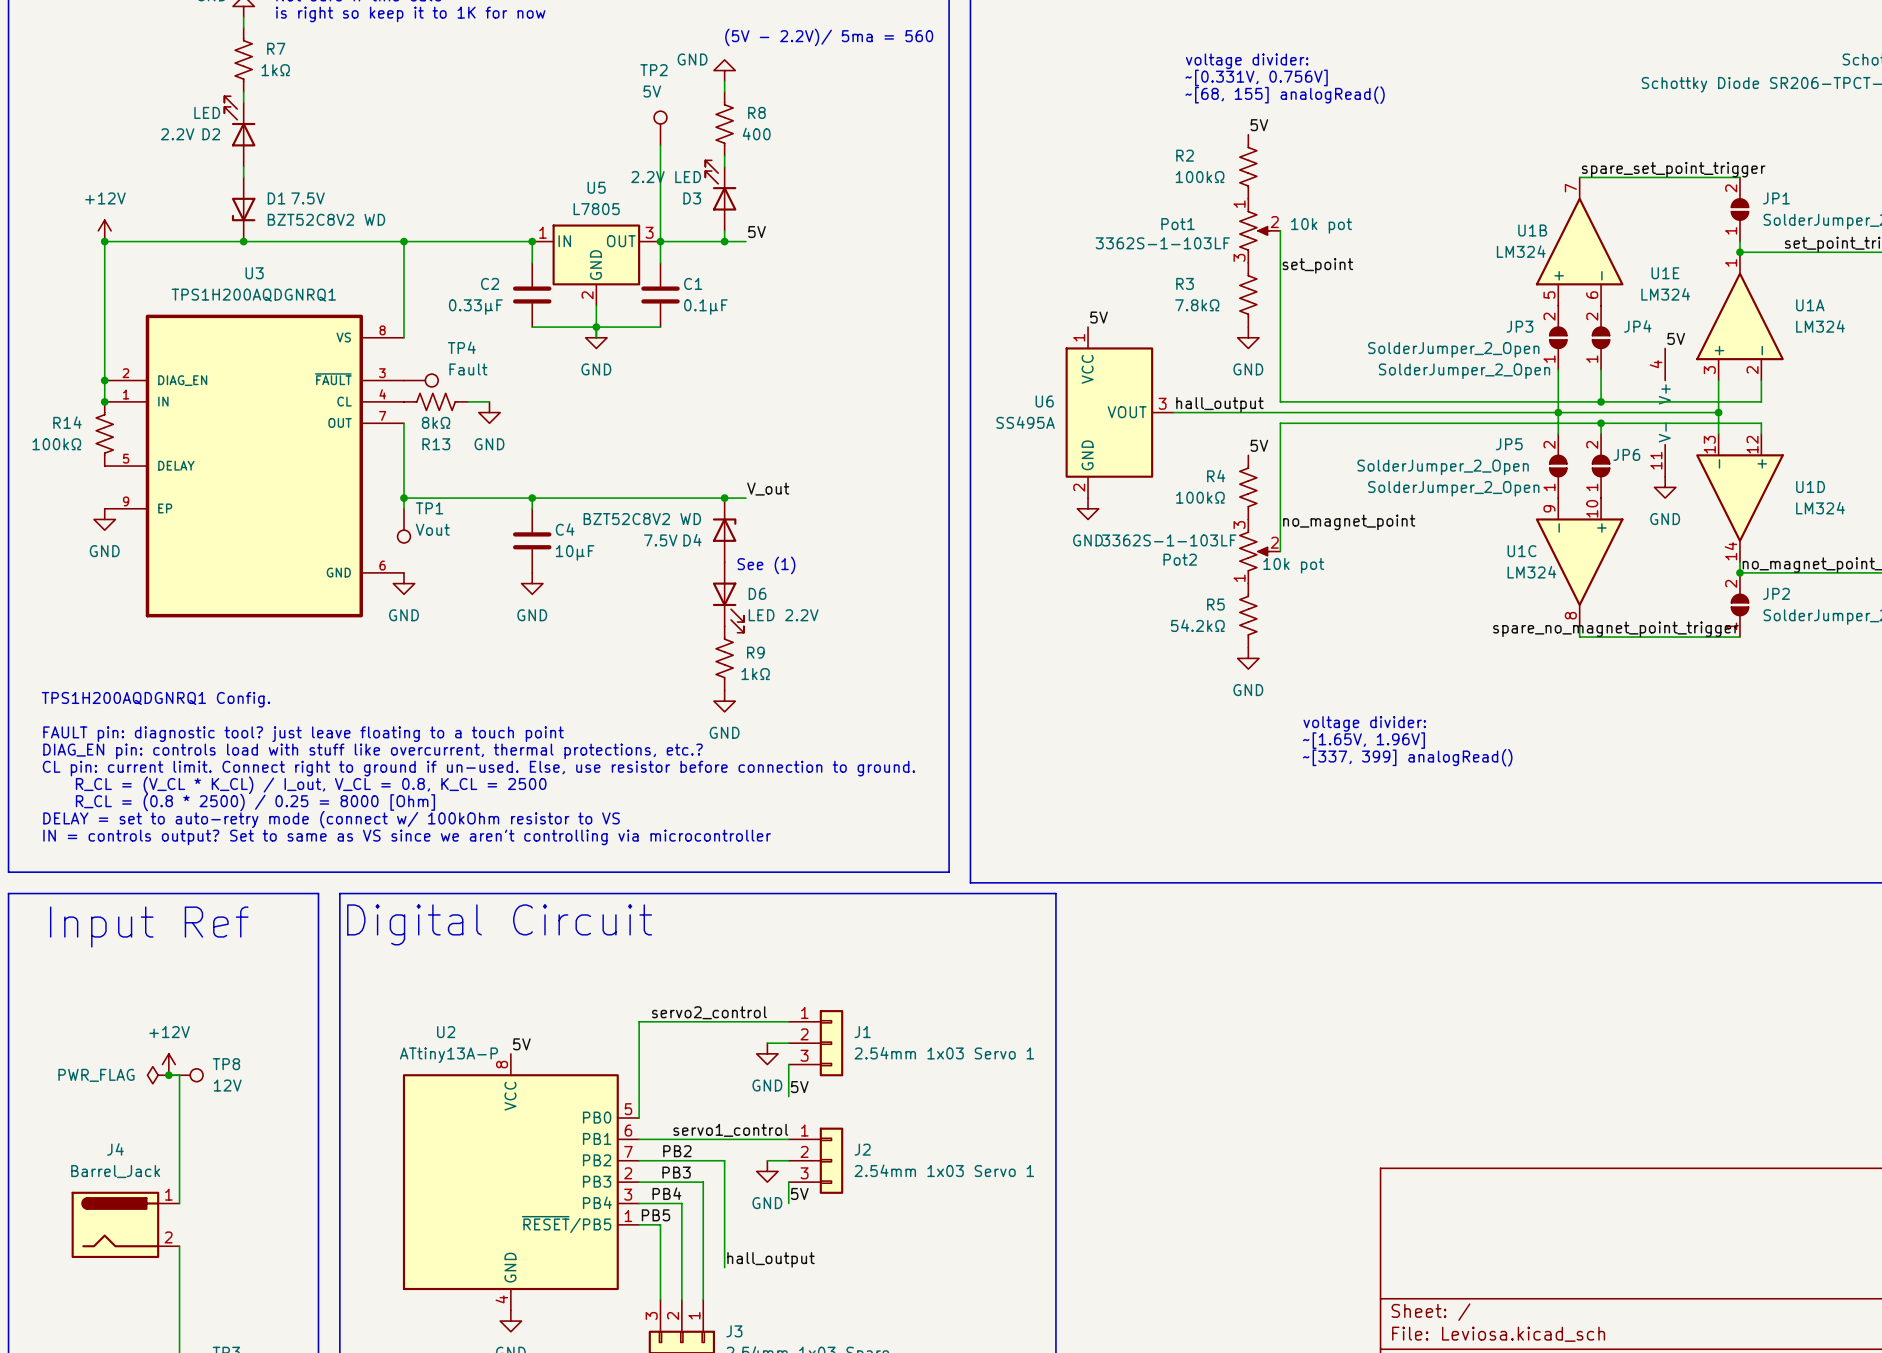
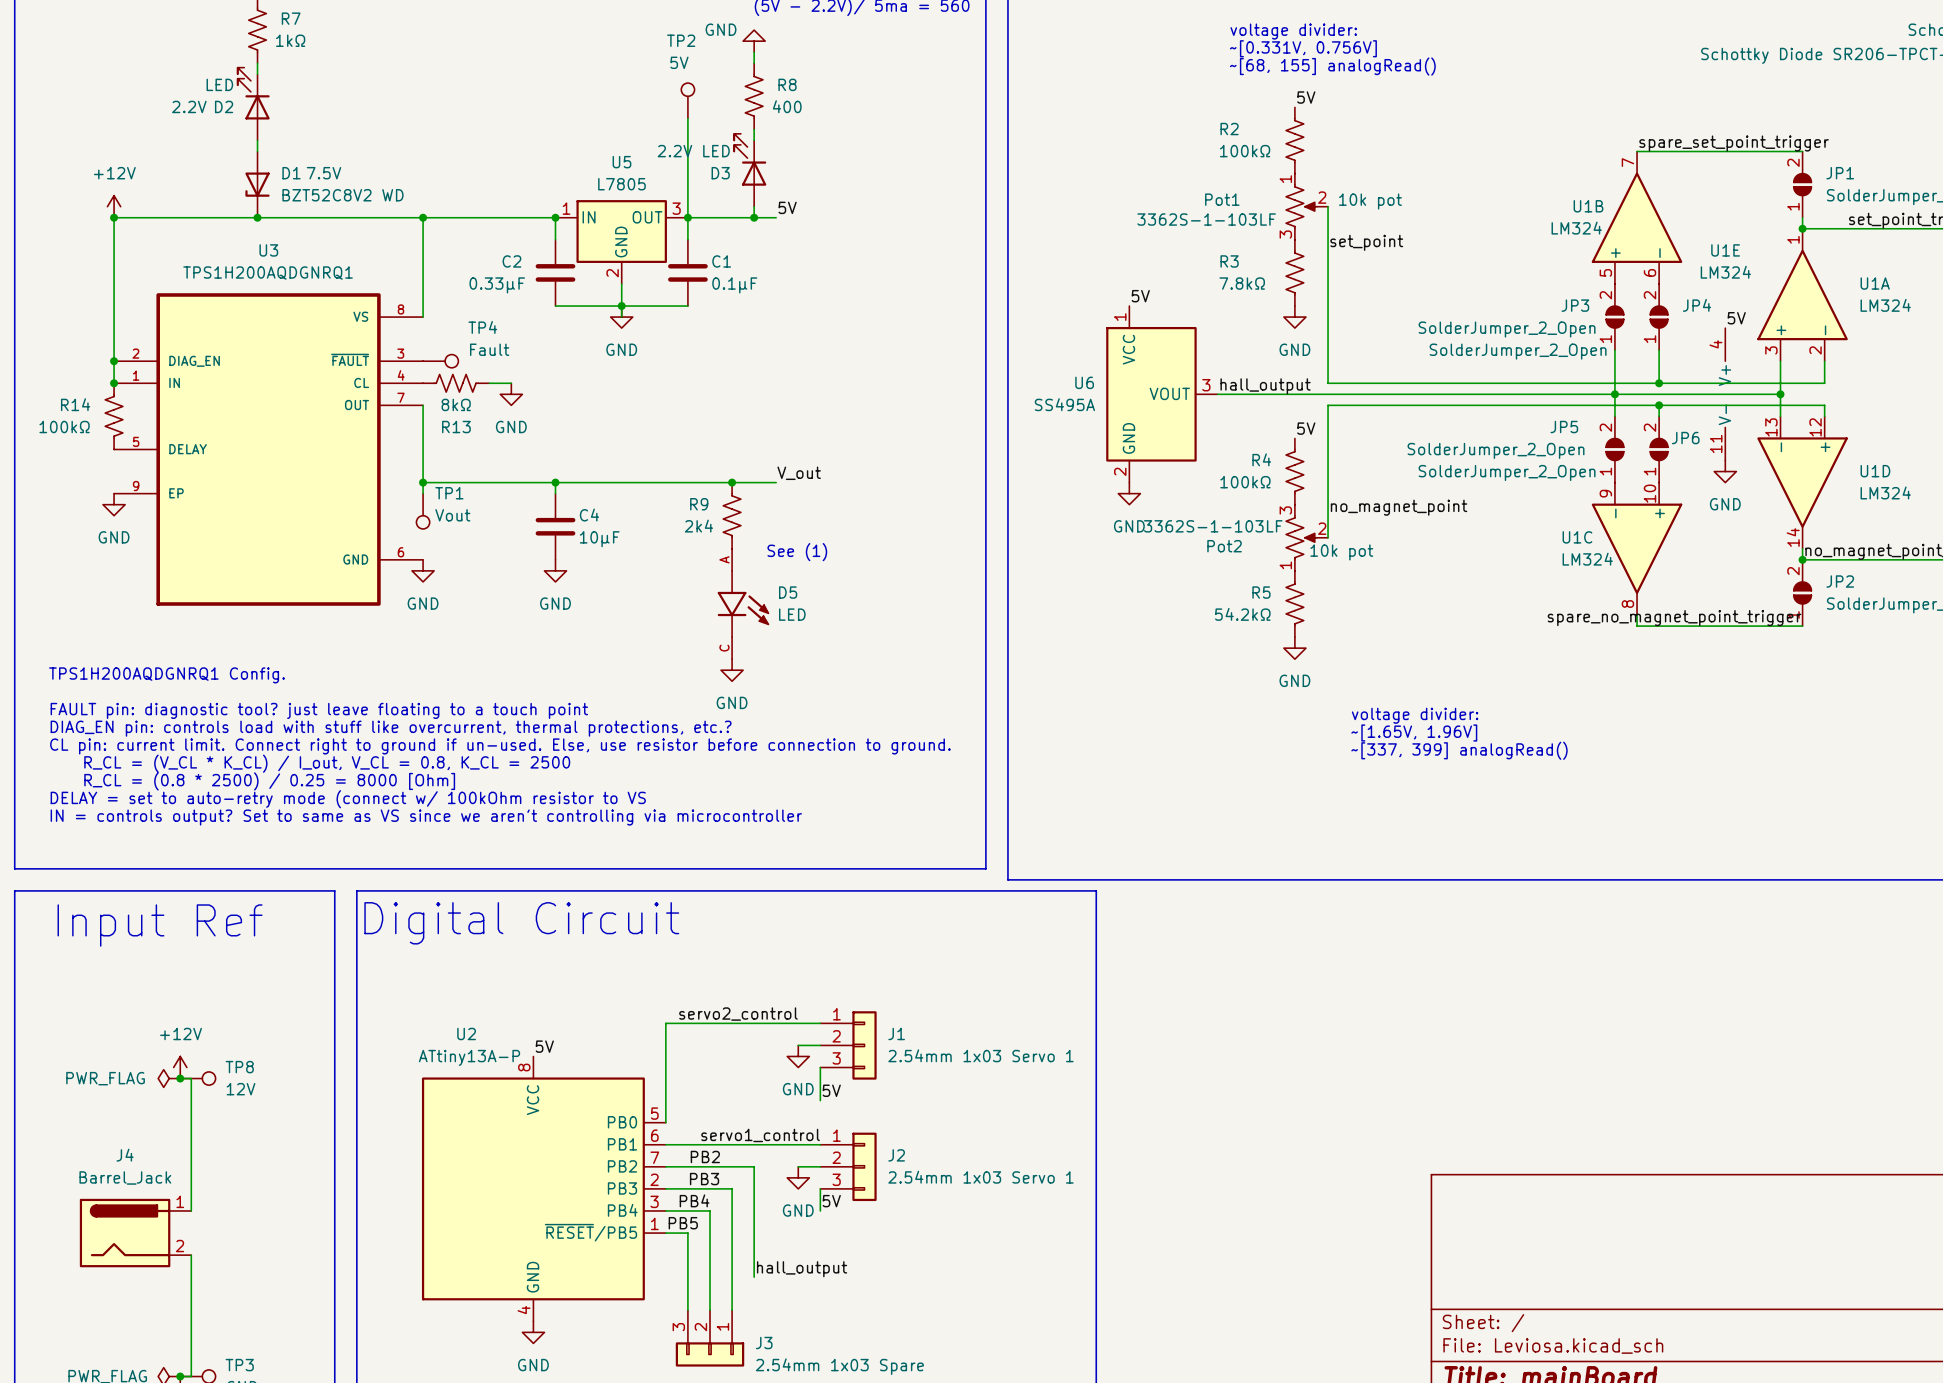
junction position: (724, 498) -> (732, 482)
D4: BZT52C8V2 WD (724, 530) -> none
D6: LED (728, 597) -> none
D5: none -> LED (743, 603)
R9 name position: R9 (755, 652) -> R9 (699, 504)
R9 position: (724, 658) -> (732, 515)
R9 value: 1kΩ (755, 674) -> 2k4 (698, 526)
text position: TPS1H200AQDGNRQ1 Config. (155, 699) -> TPS1H200AQDGNRQ1 Config. (166, 675)
power symbol position: GND (724, 701) -> GND (732, 670)
text position: FAULT pin: diagnostic tool? just leave floating to a touch point (303, 734) -> FAULT pin: diagnostic tool? just leave floating to a touch point (319, 710)
text position: DIAG_EN pin: controls load with stuff like overcurrent, thermal protections, etc.? (373, 751) -> DIAG_EN pin: controls load with stuff like overcurrent, thermal protections, etc.? (391, 728)
text position: CL pin: current limit. Connect right to ground if un-used. Else, use resistor before connection to ground. (478, 768) -> CL pin: current limit. Connect right to ground if un-used. Else, use resistor before connection to ground. (500, 746)
text position: R_CL = (V_CL * K_CL) / I_out, V_CL = 0.8, K_CL = 2500 (311, 785) -> R_CL = (V_CL * K_CL) / I_out, V_CL = 0.8, K_CL = 2500 (327, 763)
text position: R_CL = (0.8 * 2500) / 0.25 = 8000 [Ohm] (255, 802) -> R_CL = (0.8 * 2500) / 0.25 = 8000 [Ohm] (269, 781)
text position: DELAY = set to auto-retry mode (connect w/ 100kOhm resistor to VS (331, 819) -> DELAY = set to auto-retry mode (connect w/ 100kOhm resistor to VS (348, 799)
text position: IN = controls output? Set to same as VS since we aren't controlling via microcontroller (407, 837) -> IN = controls output? Set to same as VS since we aren't controlling via microcontroller (426, 817)

